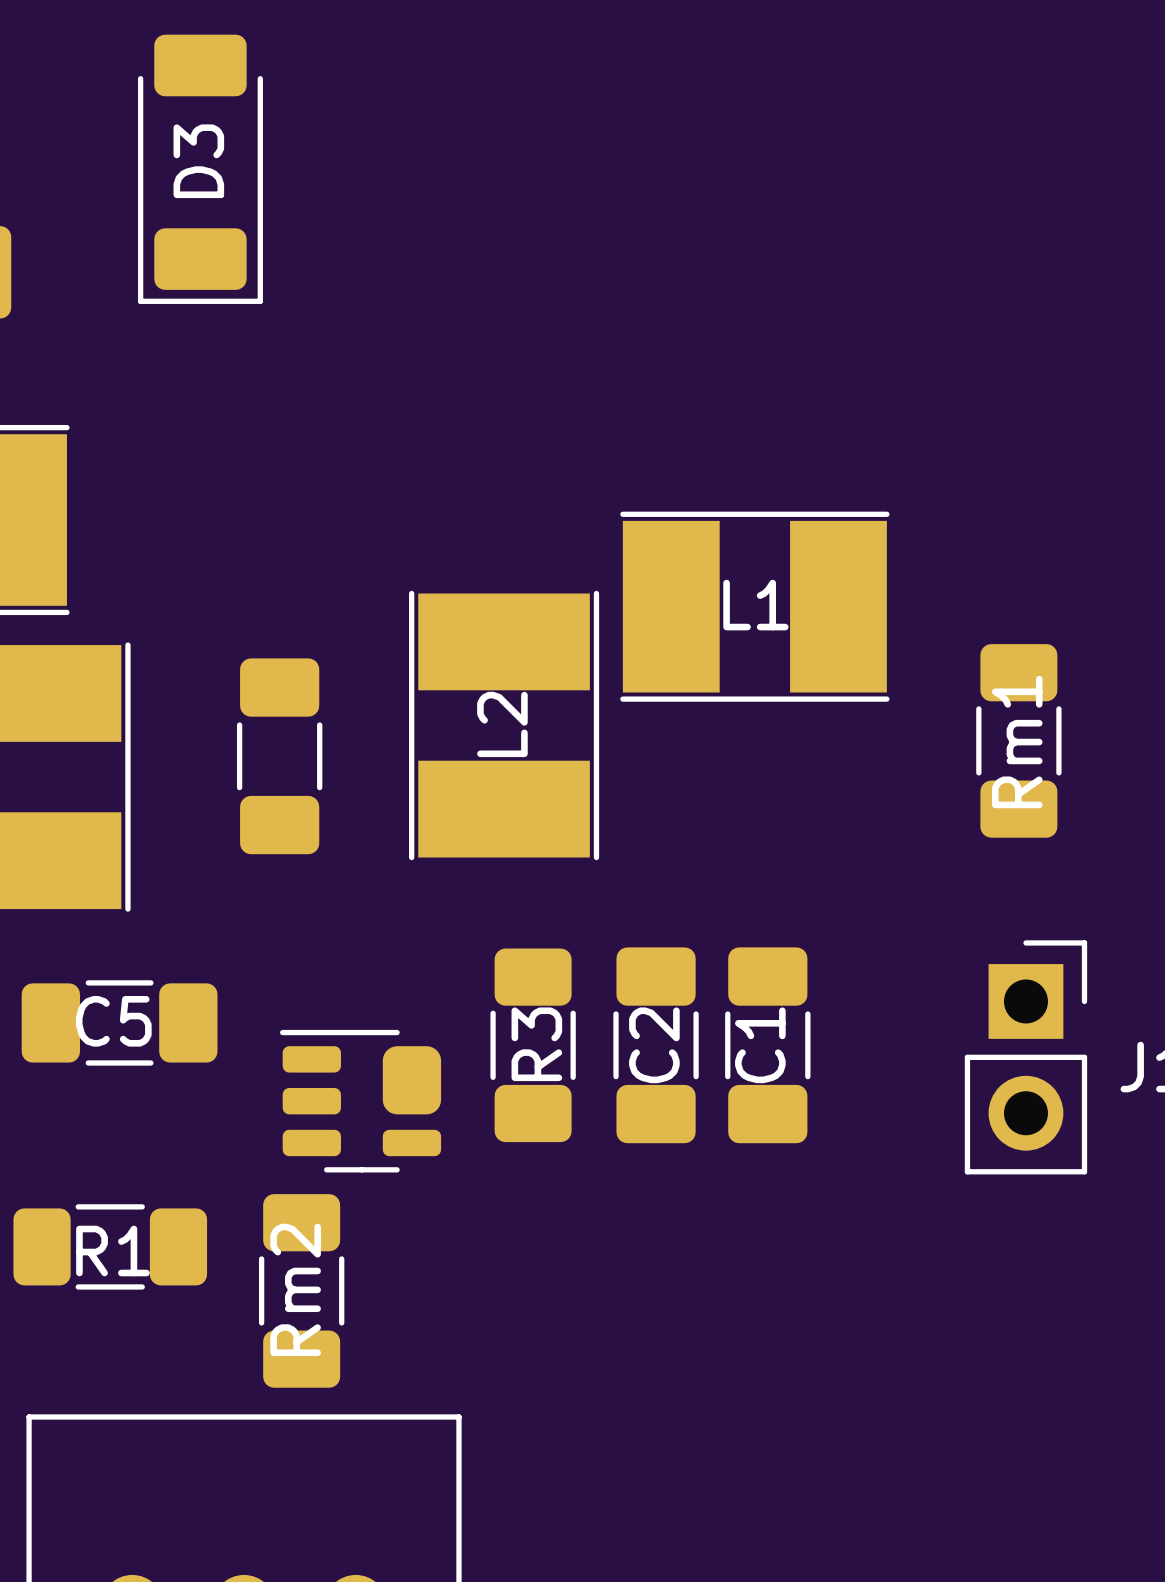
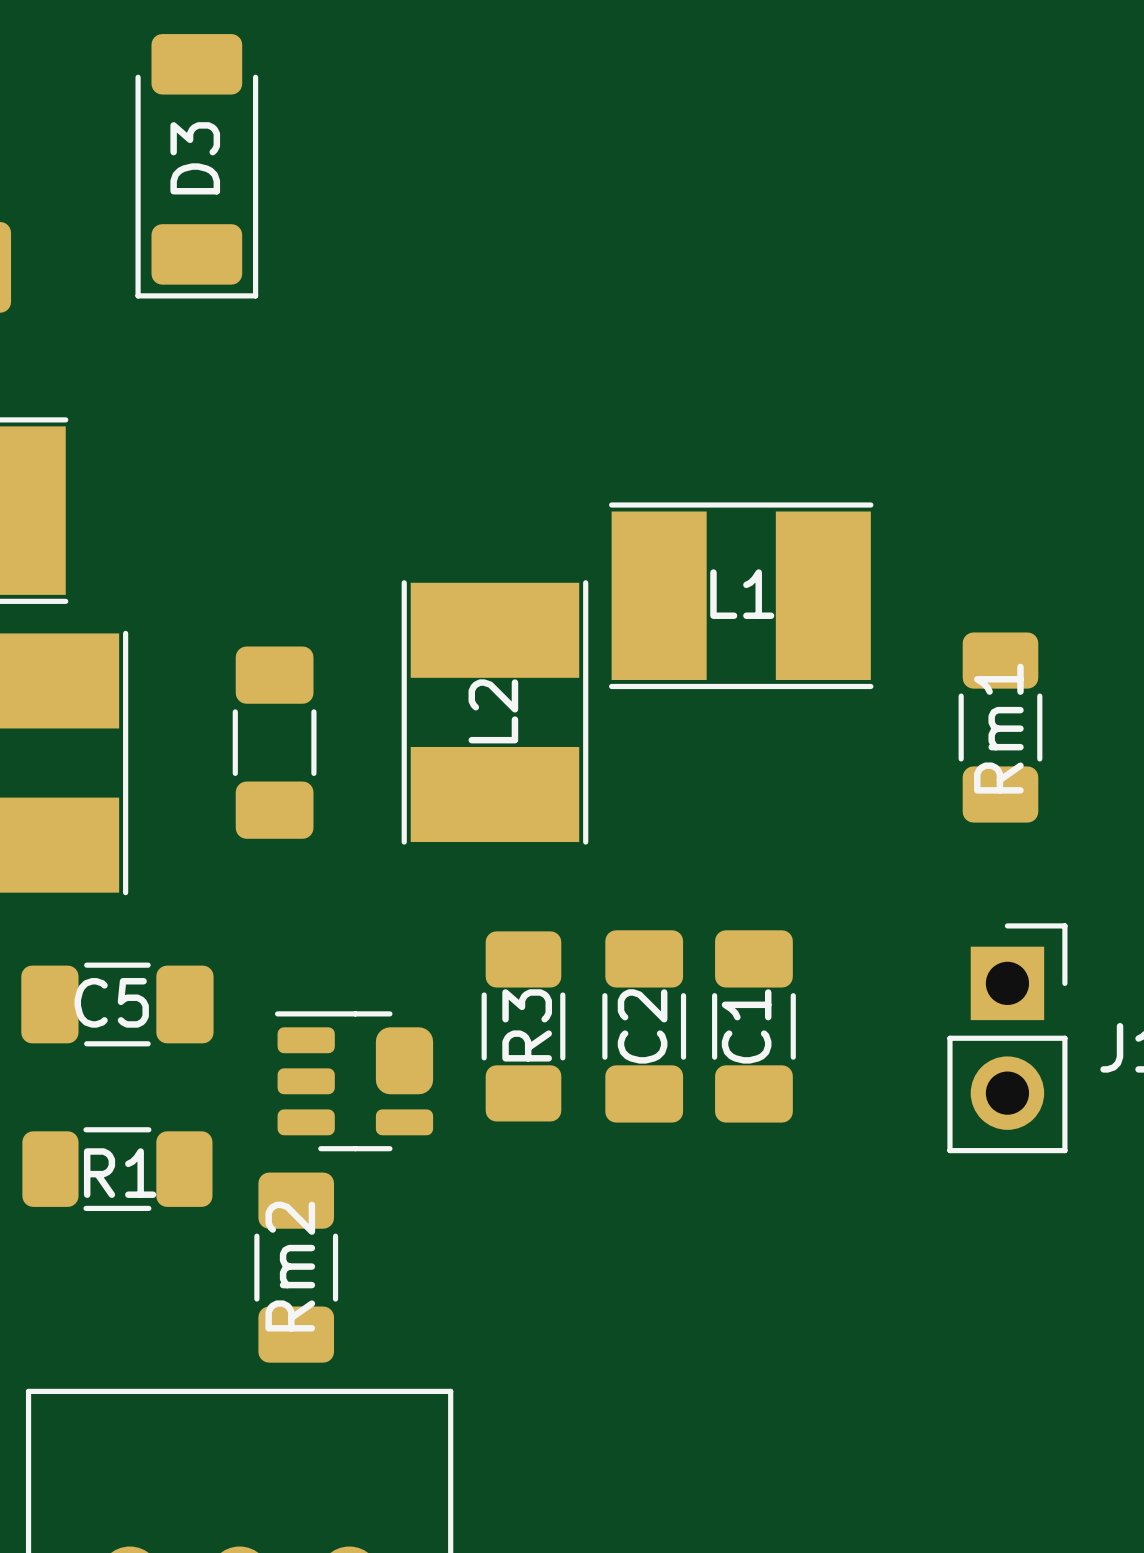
R1 position: (110, 1246) -> (117, 1169)

